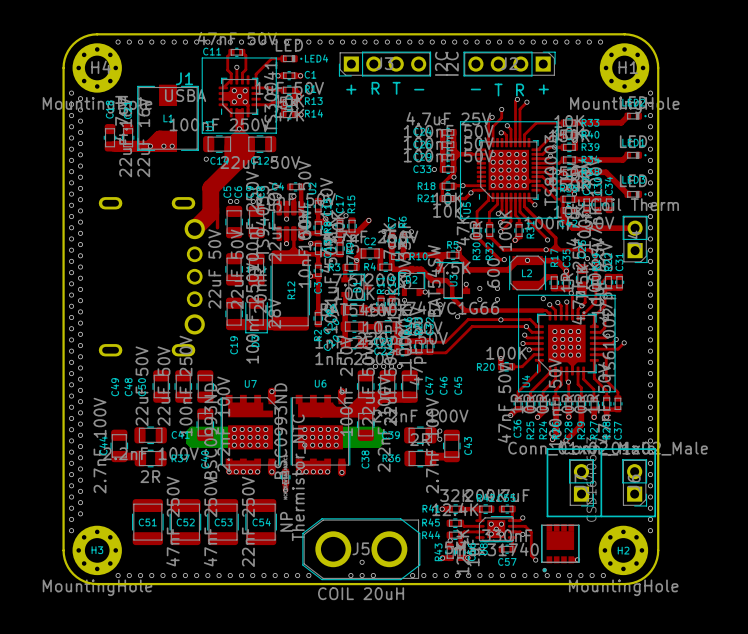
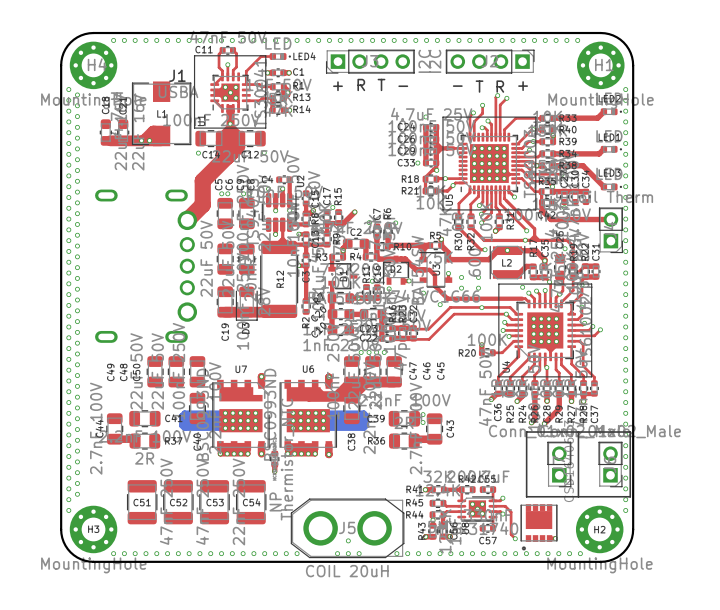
via: none -> (141, 140)
via: (150, 146) -> none
via: none -> (149, 140)
via: (163, 146) -> none
via: (172, 146) -> none
top track: (217, 208) (217, 227) -> none

